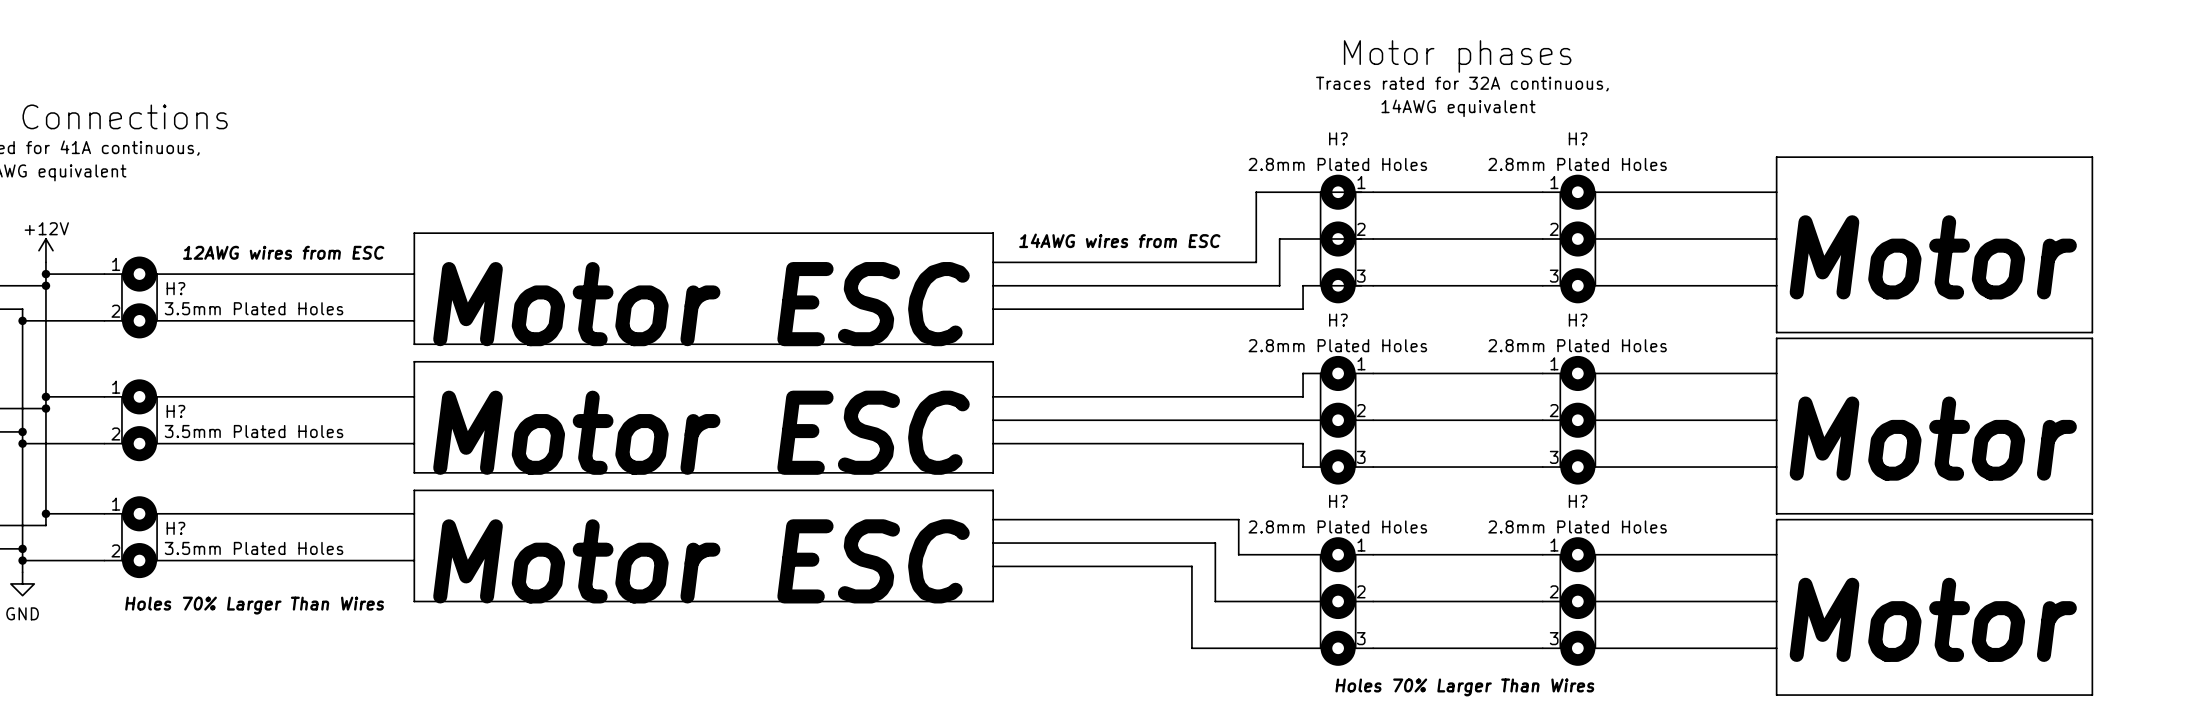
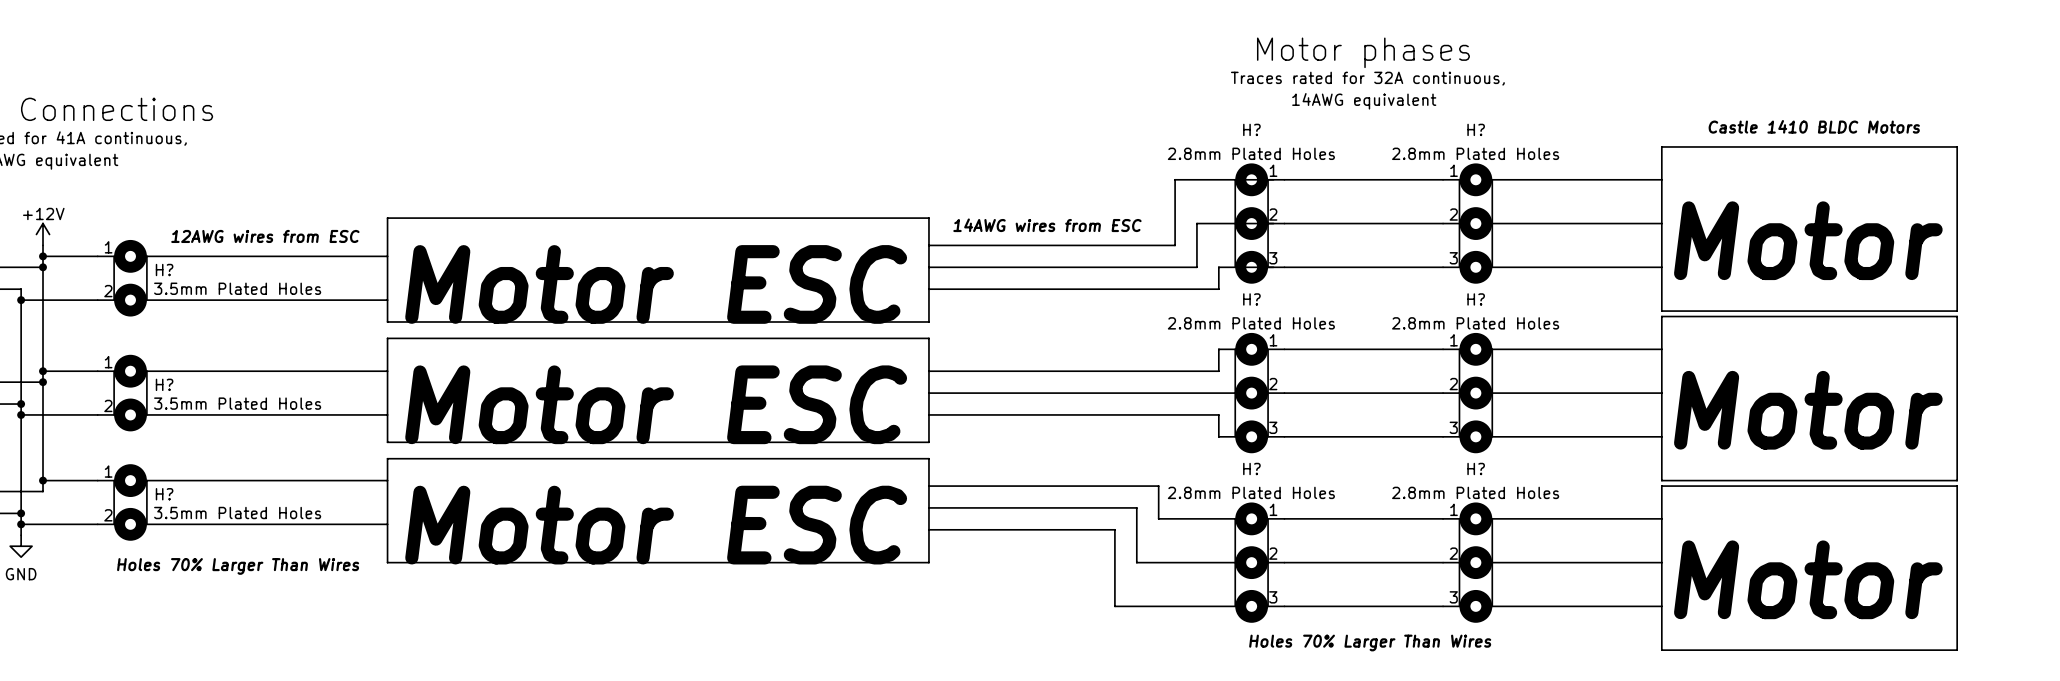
text: none -> Castle 1410 BLDC Motors (1814, 126)

